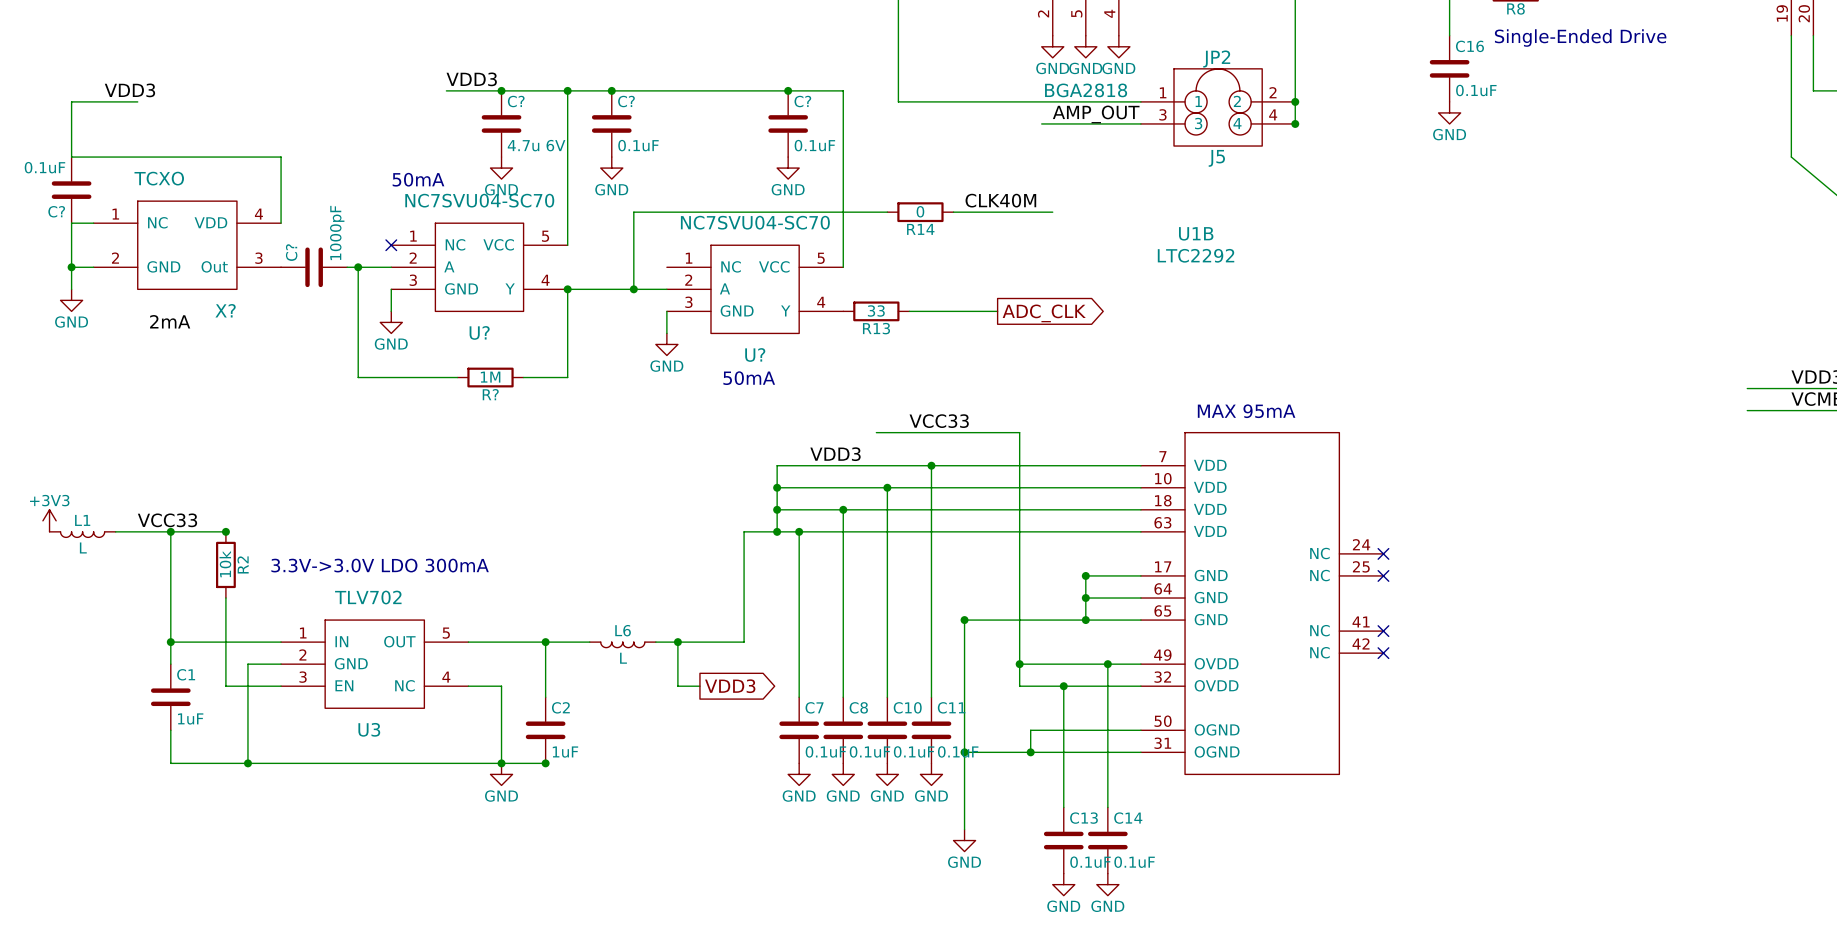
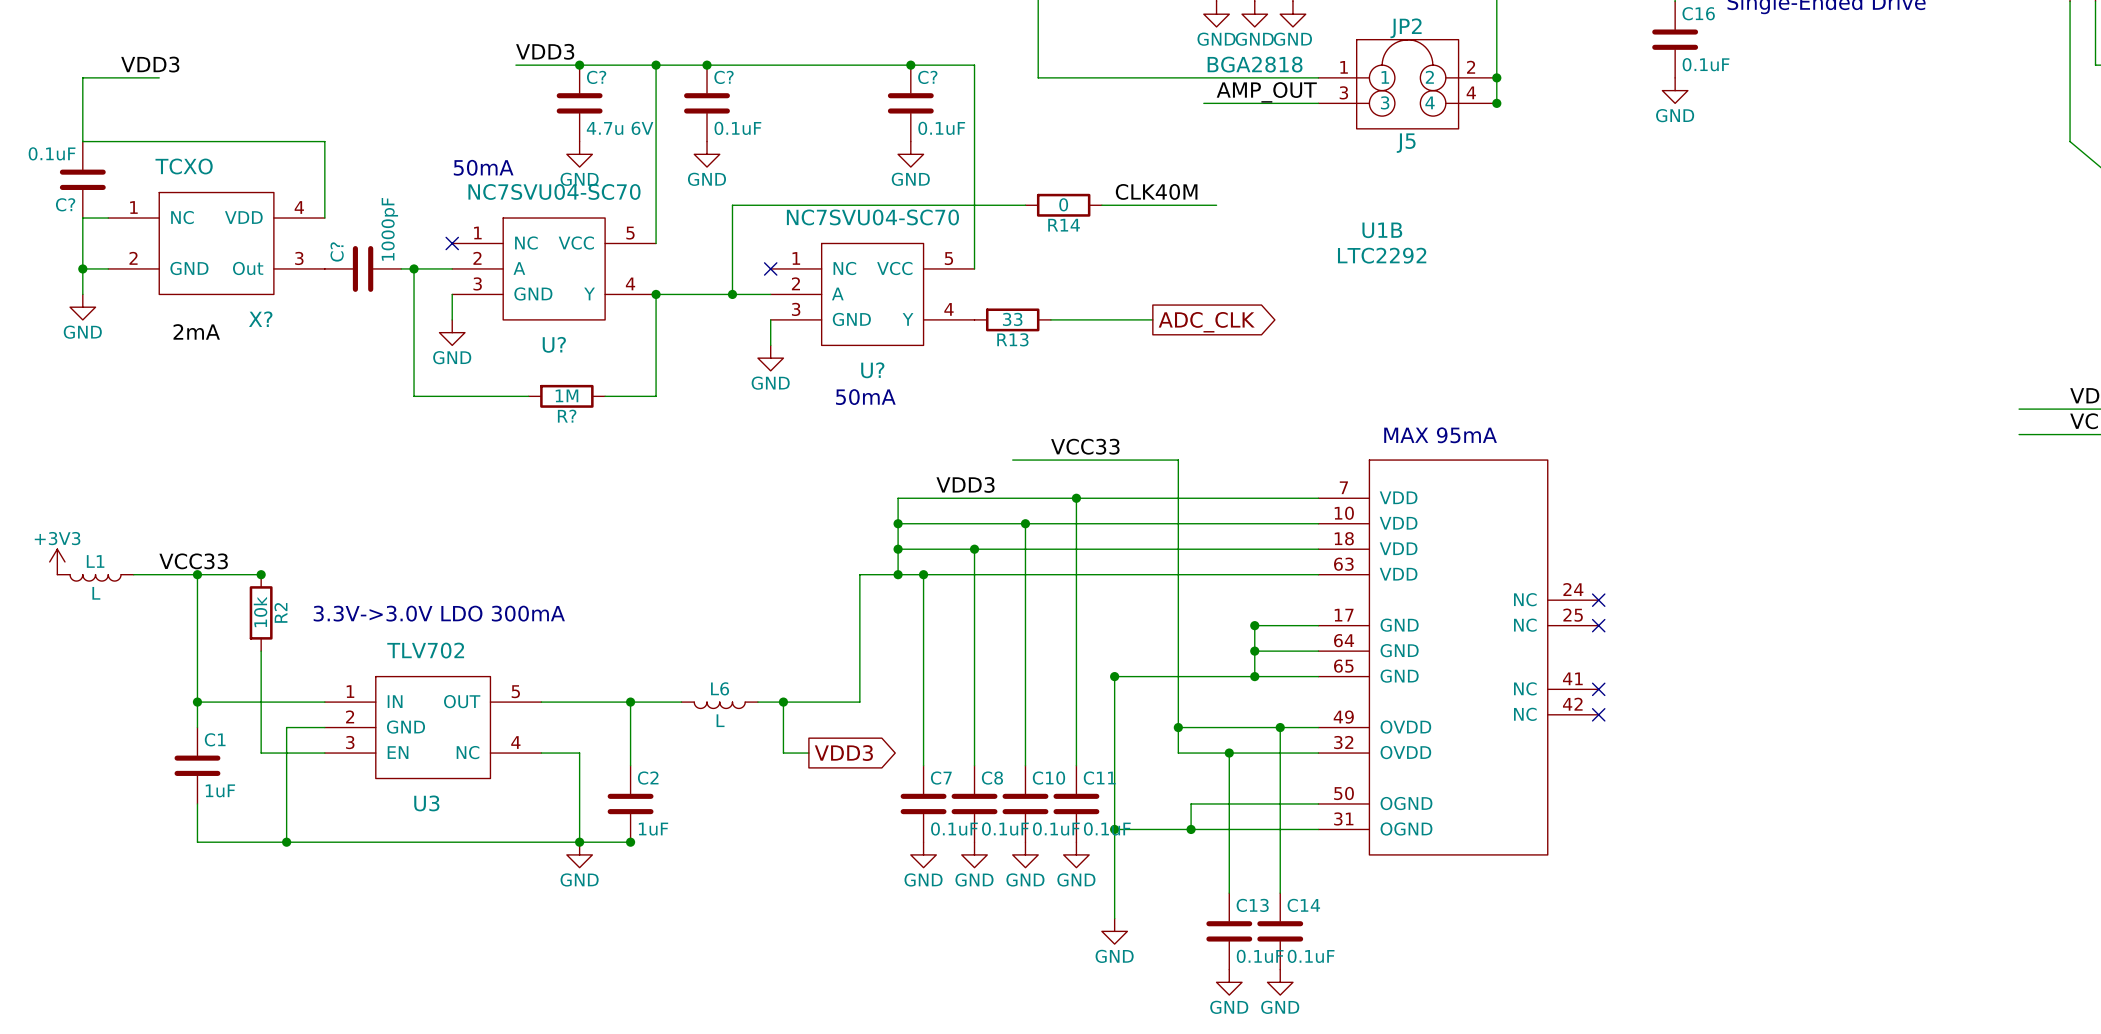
no-connect mark: none -> (770, 268)

